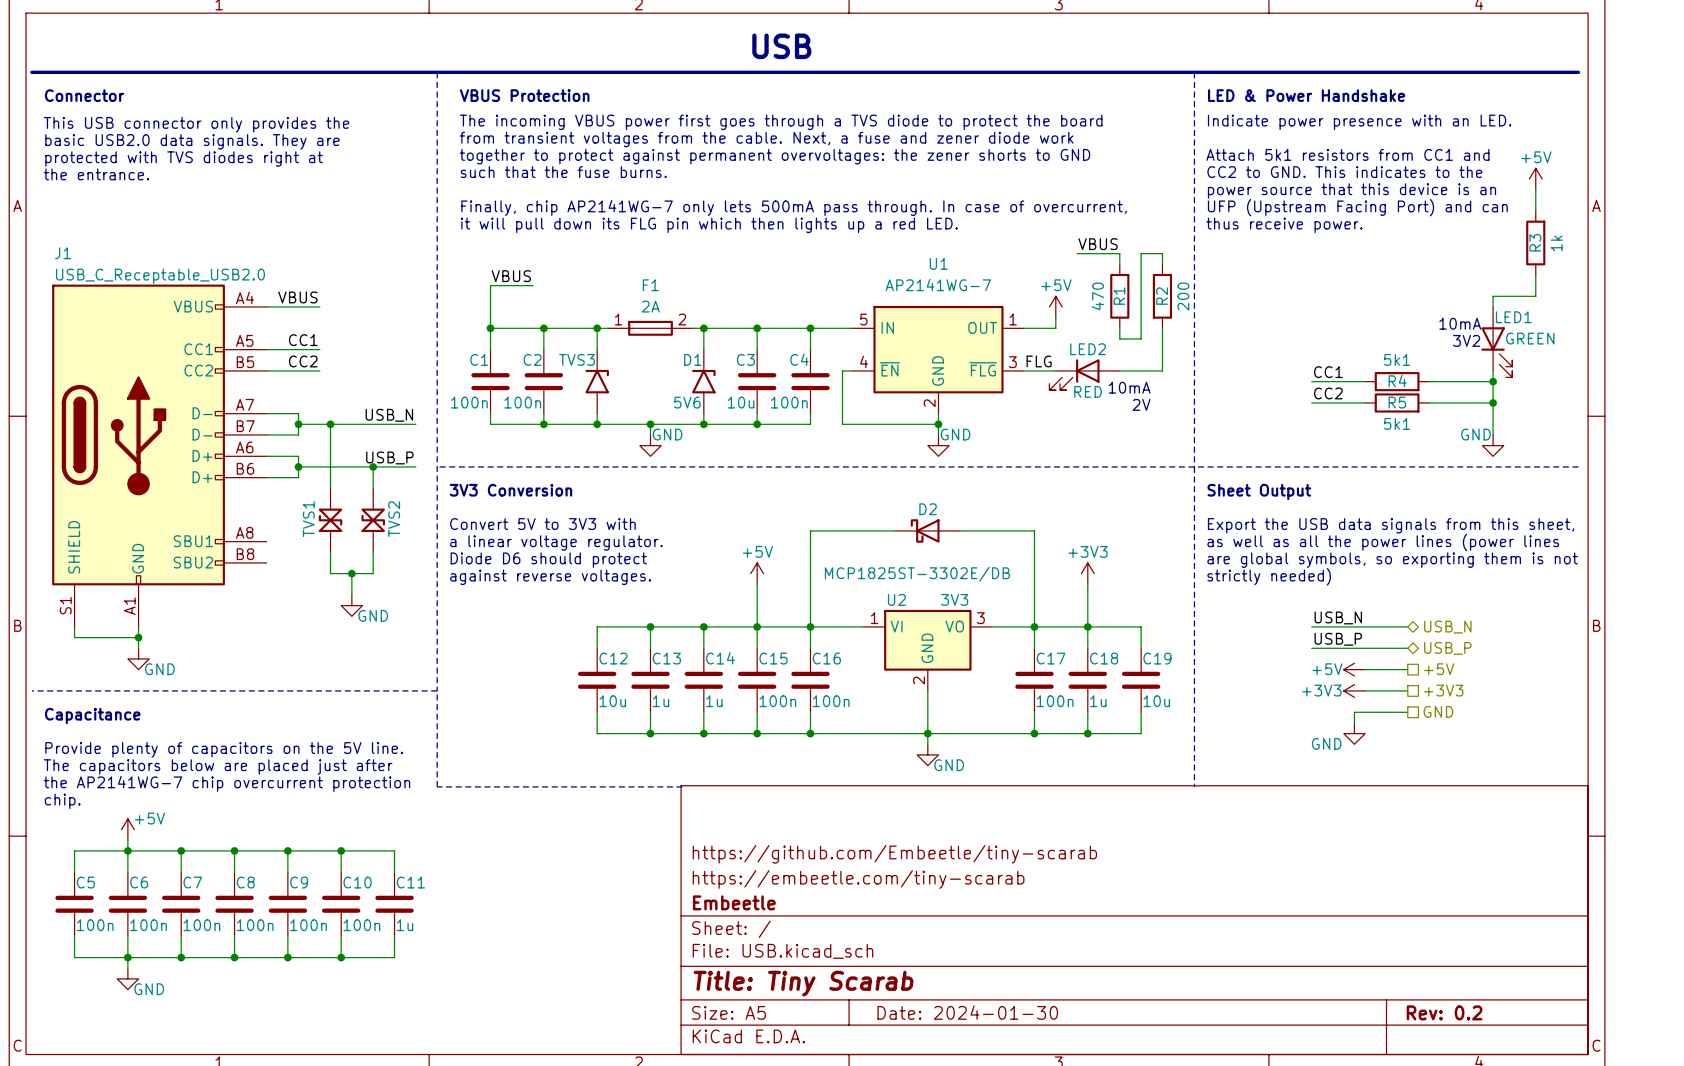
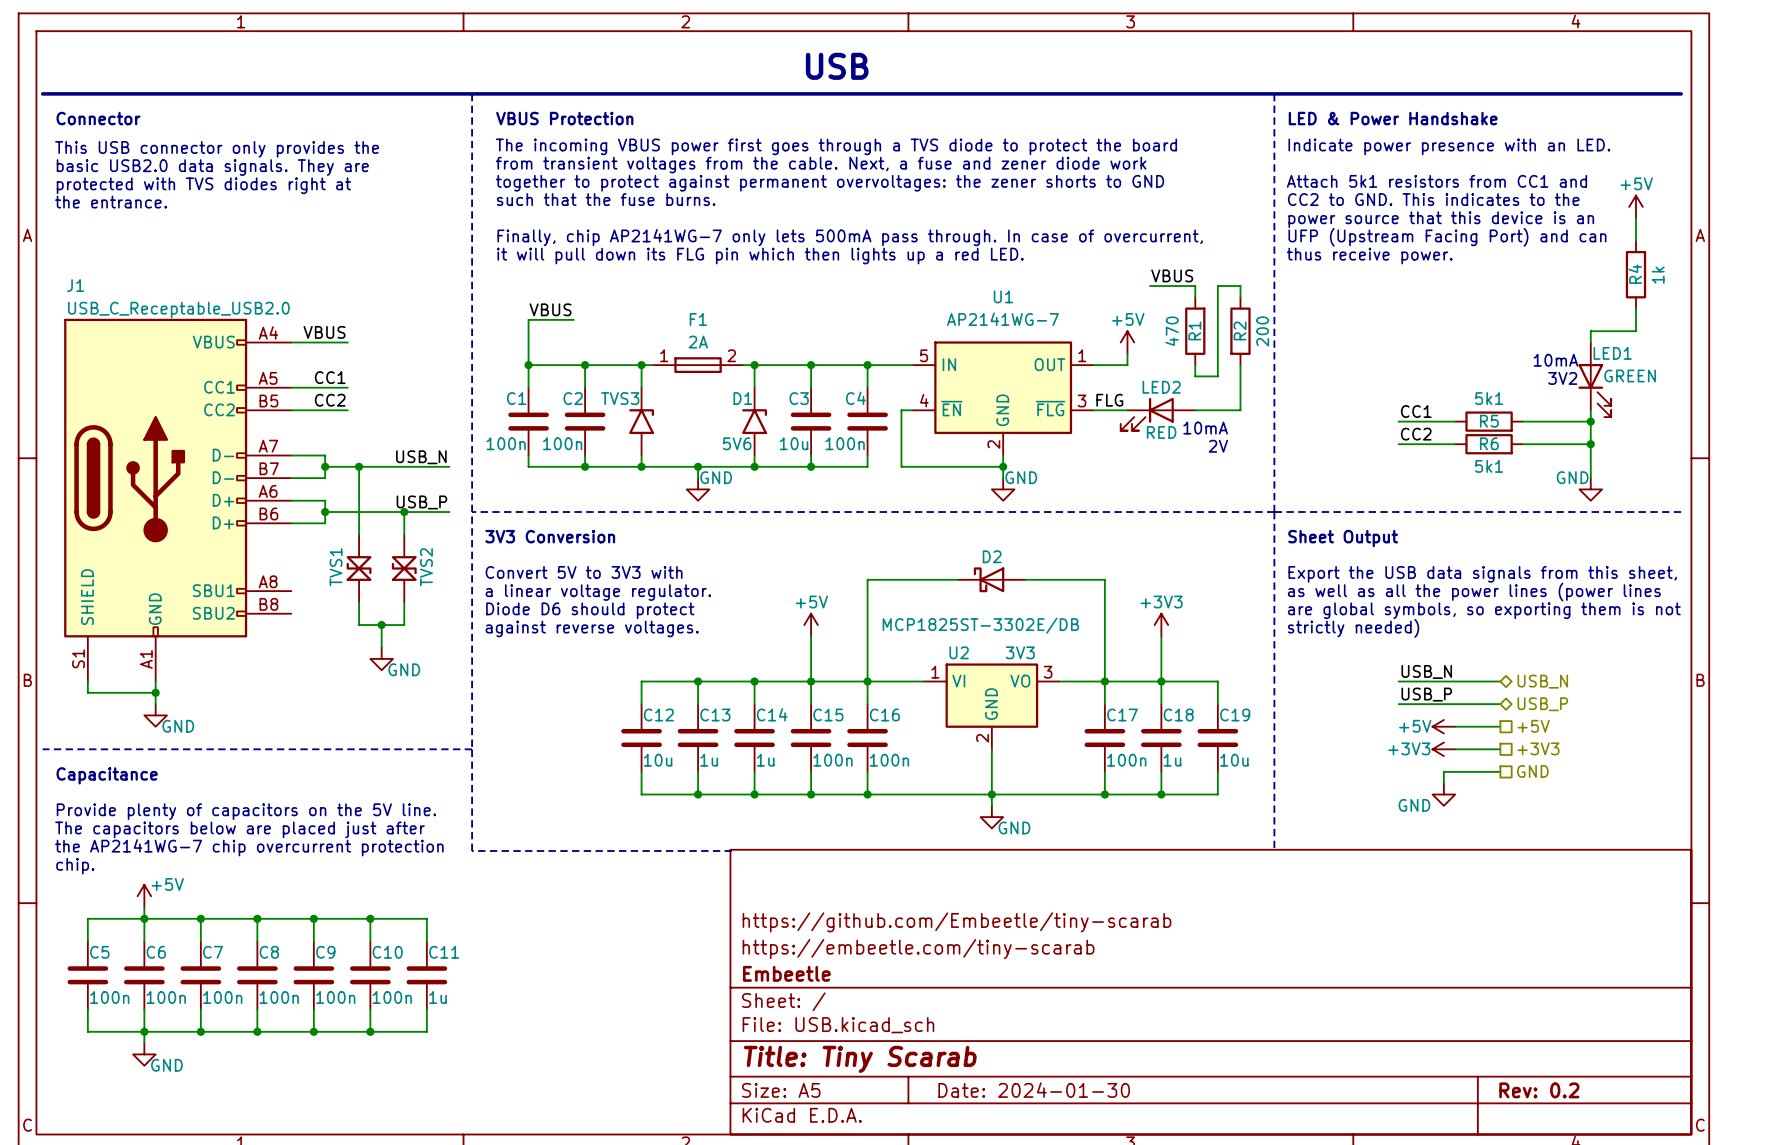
R3 name: R3 (1535, 242) -> R4 (1635, 274)
R4 name: R4 (1397, 380) -> R5 (1489, 421)
R5 name: R5 (1397, 402) -> R6 (1489, 443)

